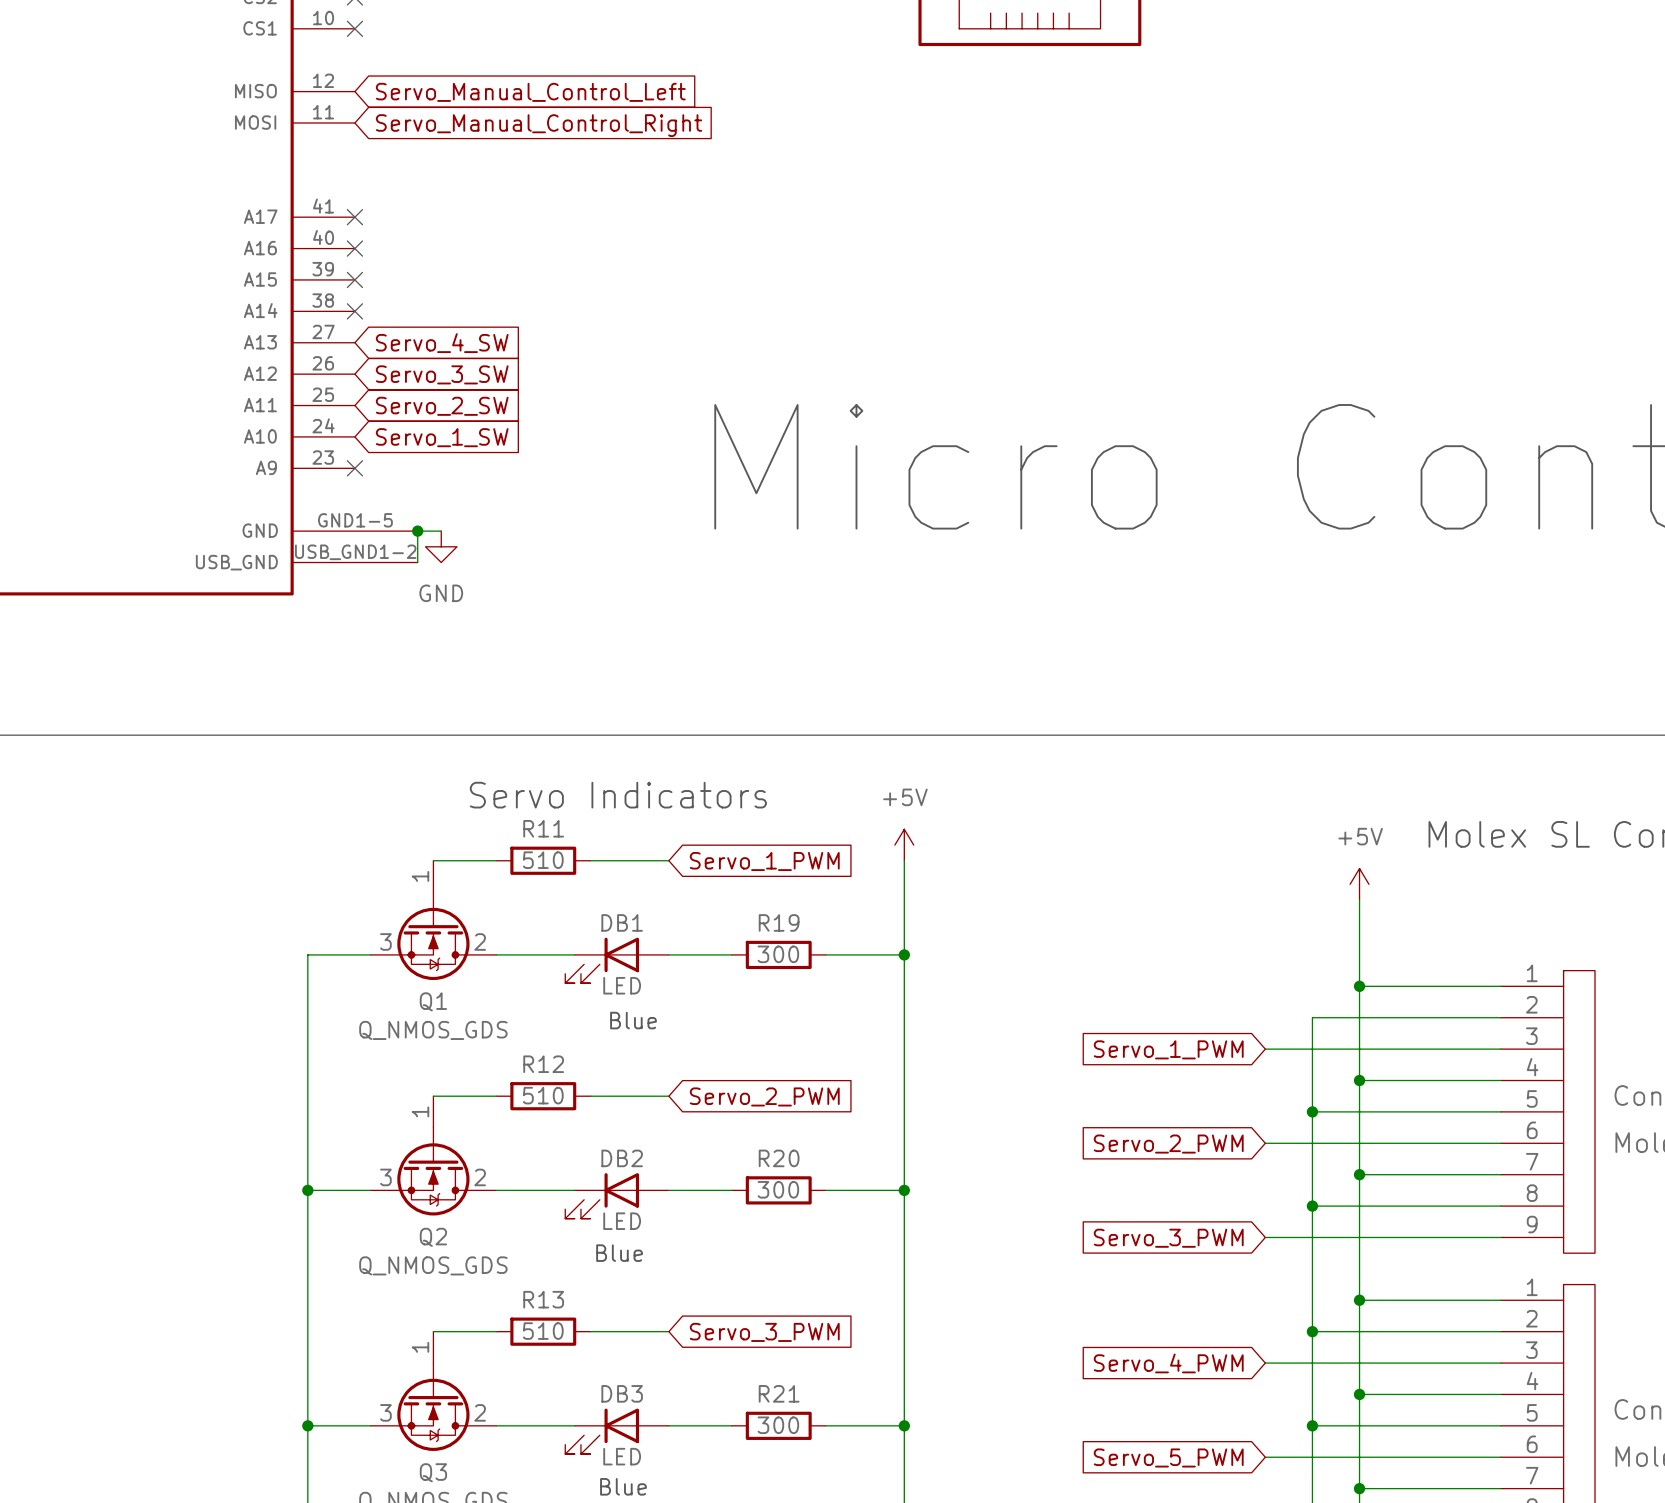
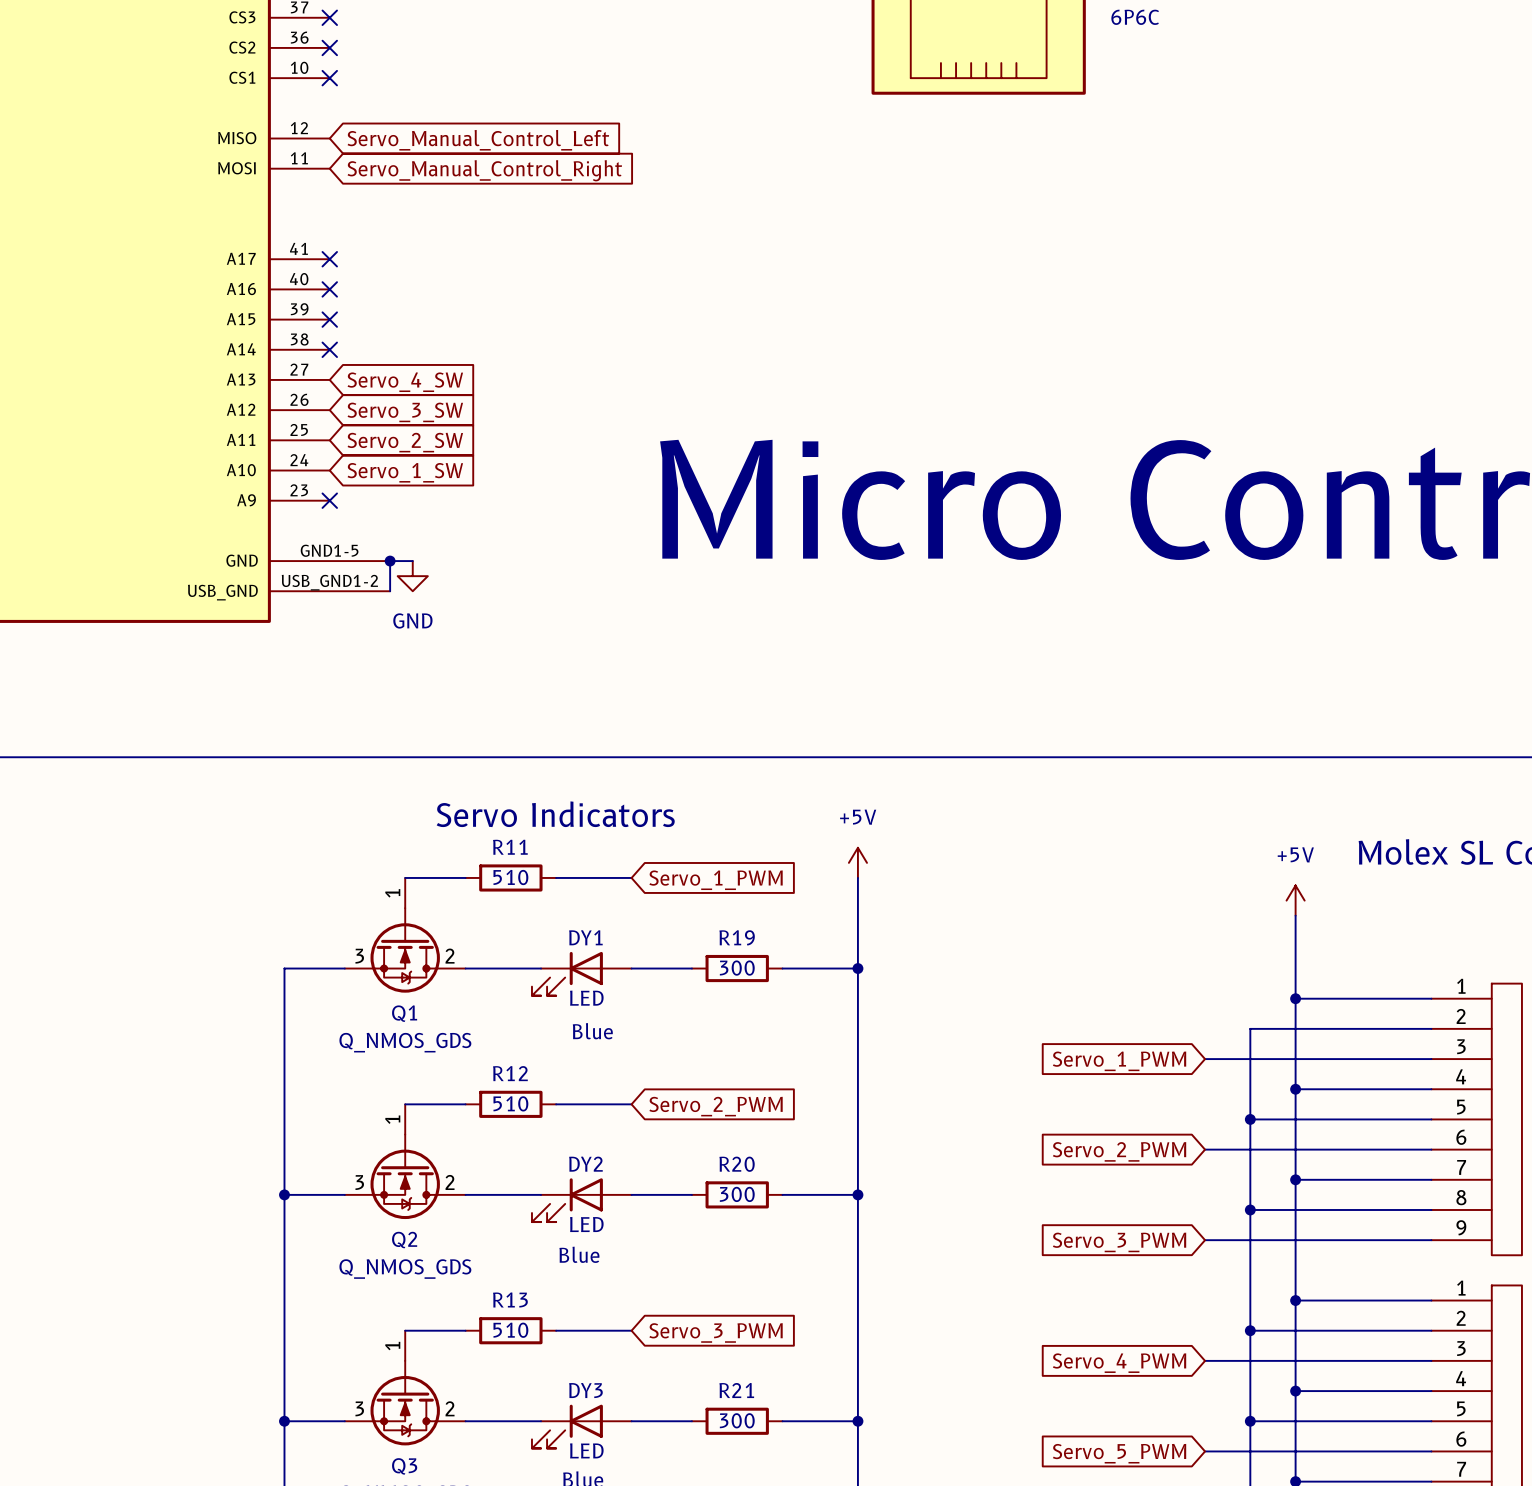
DB1 name: DB1 (622, 922) -> DY1 (585, 937)
DB2 name: DB2 (622, 1158) -> DY2 (585, 1164)
DB3 name: DB3 (622, 1393) -> DY3 (585, 1390)

